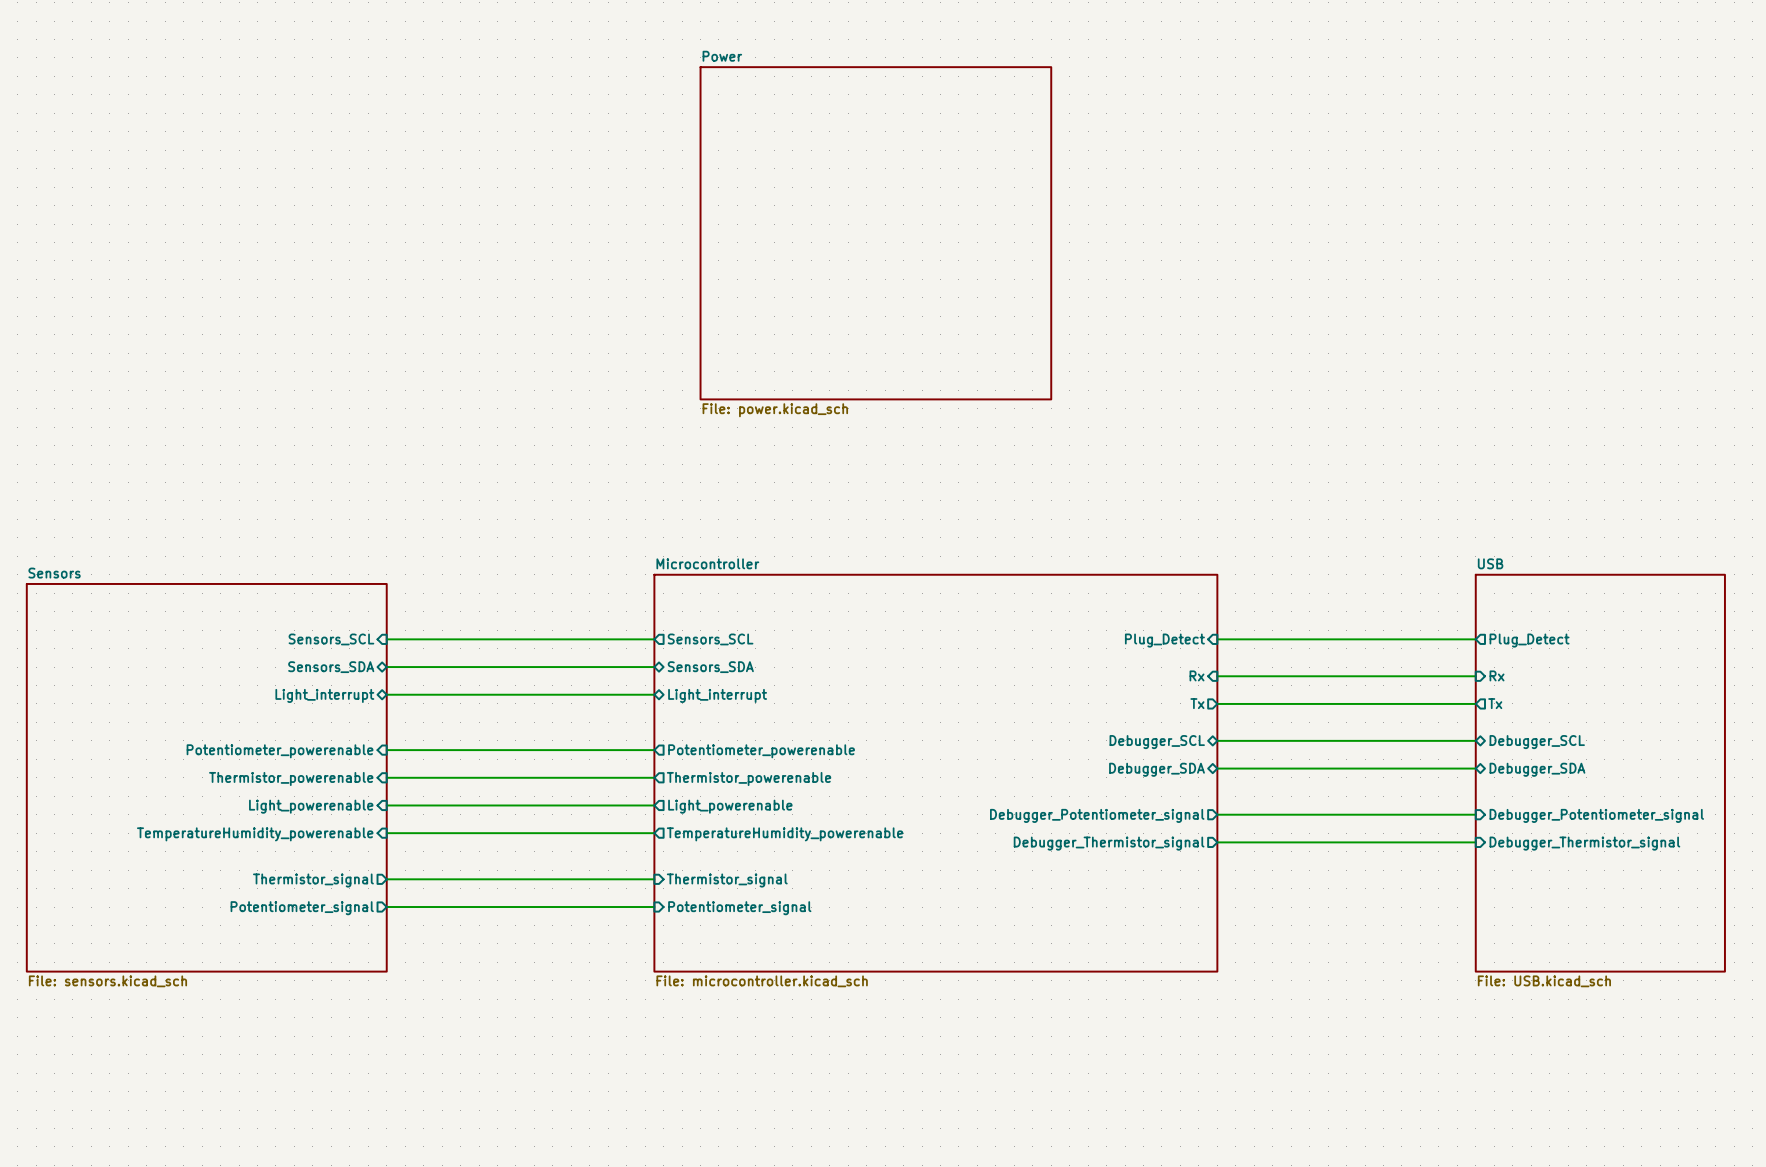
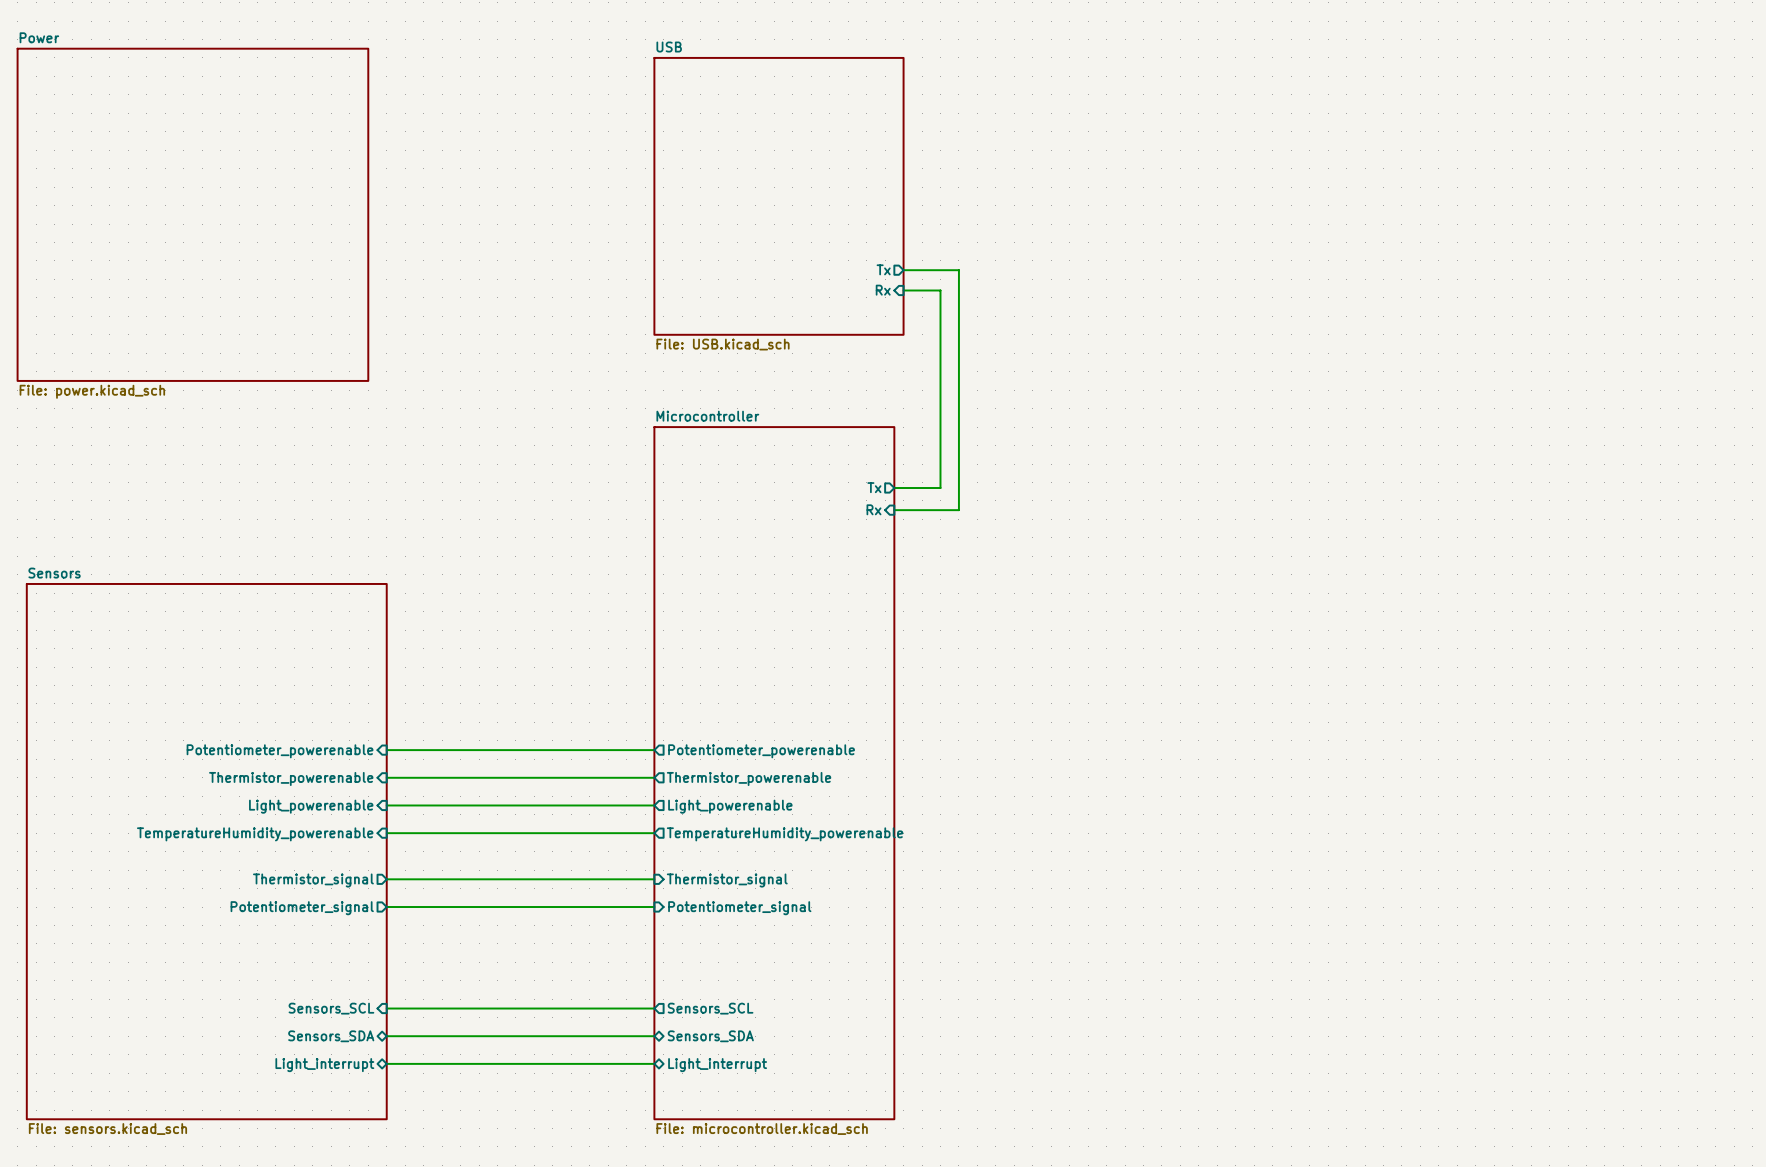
sheet USB: none -> File: USB.kicad_sch (778, 196)
sheet Power: none -> File: power.kicad_sch (192, 214)
sheet Power: File: power.kicad_sch (875, 233) -> none
sheet pin: none -> Tx (883, 269)
wire: none -> (903, 270) (958, 270) (958, 510) (894, 510)
sheet pin: none -> Rx (883, 290)
wire: none -> (903, 290) (940, 290) (940, 488) (894, 488)
sheet pin: none -> Tx (874, 487)
sheet pin: none -> Rx (873, 509)
sheet pin: Sensors_SCL (331, 639) -> none
wire: (386, 639) (654, 639) -> none
sheet pin: Sensors_SCL (710, 639) -> none
wire: (1217, 639) (1475, 639) -> none
sheet pin: Plug_Detect (1164, 640) -> none
sheet pin: Plug_Detect (1529, 640) -> none
sheet pin: Sensors_SDA (331, 667) -> none
wire: (386, 667) (654, 667) -> none
sheet pin: Sensors_SDA (710, 667) -> none
sheet pin: Rx (1197, 675) -> none
sheet pin: Rx (1497, 675) -> none
wire: (1217, 676) (1475, 676) -> none
wire: (386, 694) (654, 694) -> none
sheet pin: Light_interrupt (324, 695) -> none
sheet pin: Light_interrupt (717, 695) -> none
sheet pin: Tx (1197, 703) -> none
wire: (1217, 703) (1475, 703) -> none
sheet pin: Tx (1495, 703) -> none
wire: (1217, 740) (1475, 740) -> none
sheet pin: Debugger_SCL (1157, 742) -> none
sheet pin: Debugger_SCL (1537, 742) -> none
wire: (1217, 768) (1475, 768) -> none
sheet pin: Debugger_SDA (1157, 769) -> none
sheet pin: Debugger_SDA (1537, 769) -> none
sheet Microcontroller: none -> File: microcontroller.kicad_sch (774, 773)
sheet Microcontroller: File: microcontroller.kicad_sch (935, 773) -> none
sheet USB: File: USB.kicad_sch (1600, 773) -> none
sheet Sensors: File: sensors.kicad_sch (206, 777) -> none
wire: (1217, 814) (1475, 814) -> none
sheet pin: Debugger_Potentiometer_signal (1097, 815) -> none
sheet pin: Debugger_Potentiometer_signal (1596, 815) -> none
wire: (1217, 842) (1475, 842) -> none
sheet pin: Debugger_Thermistor_signal (1109, 843) -> none
sheet pin: Debugger_Thermistor_signal (1584, 843) -> none
sheet Sensors: none -> File: sensors.kicad_sch (206, 851)
sheet pin: none -> Sensors_SCL (331, 1008)
wire: none -> (386, 1008) (654, 1008)
sheet pin: none -> Sensors_SCL (710, 1008)
sheet pin: none -> Sensors_SDA (331, 1036)
wire: none -> (386, 1036) (654, 1036)
sheet pin: none -> Sensors_SDA (710, 1036)
wire: none -> (386, 1063) (654, 1063)
sheet pin: none -> Light_interrupt (324, 1065)
sheet pin: none -> Light_interrupt (717, 1065)

